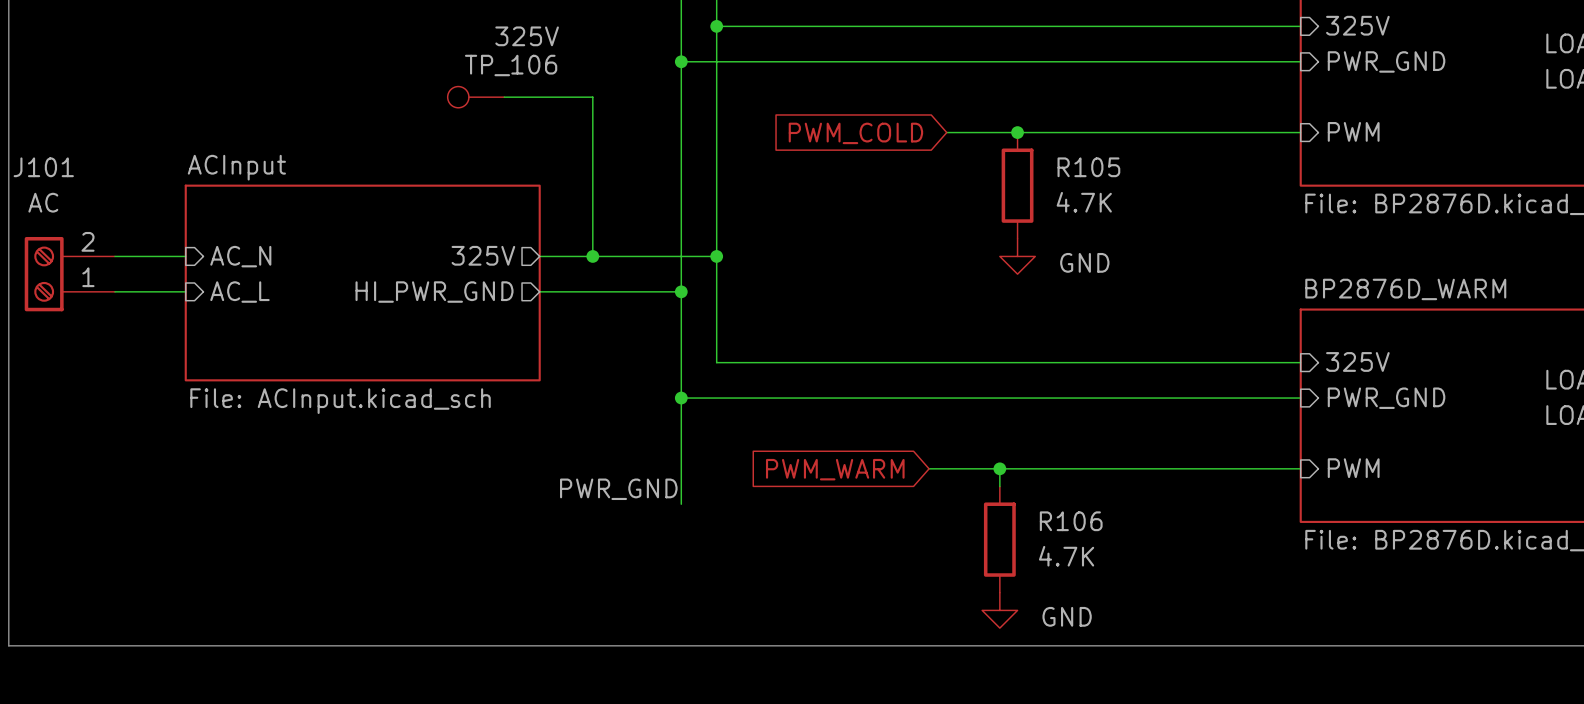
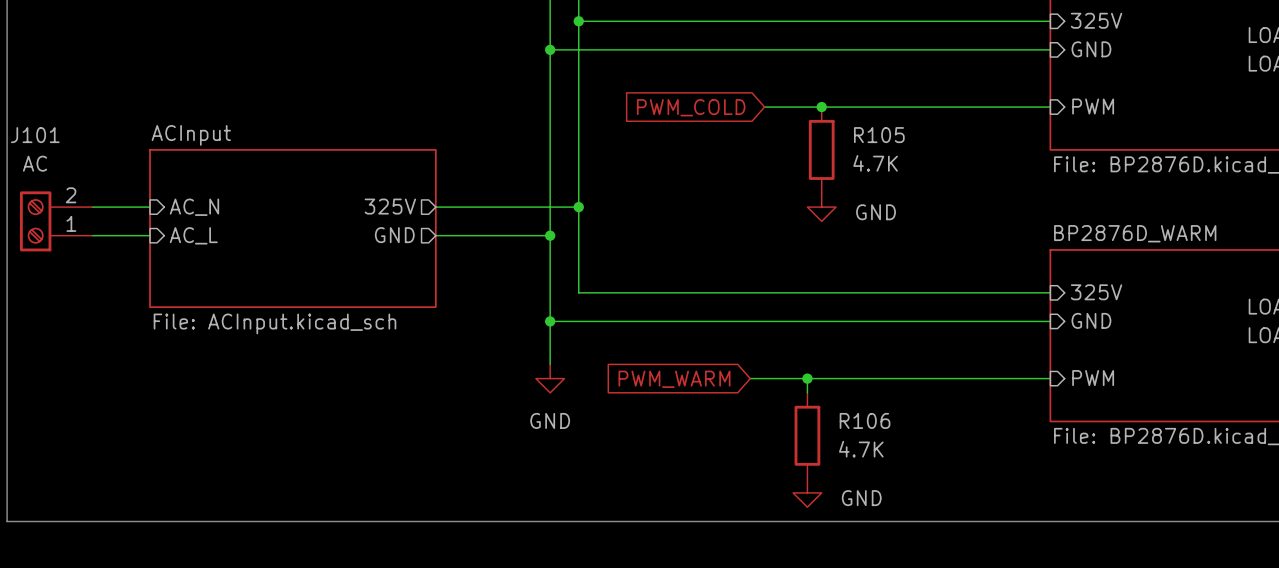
sheet pin: PWR_GND (1386, 61) -> GND (1091, 49)
TP_106: 325V (476, 97) -> none
wire: (504, 97) (592, 97) (592, 256) -> none
junction: (592, 256) -> none
sheet pin: HI_PWR_GND (434, 292) -> GND (394, 235)
sheet pin: PWR_GND (1386, 398) -> GND (1091, 320)
wire: (681, 451) (681, 504) -> none
power symbol: none -> GND (550, 378)
label: PWR_GND (618, 489) -> none

